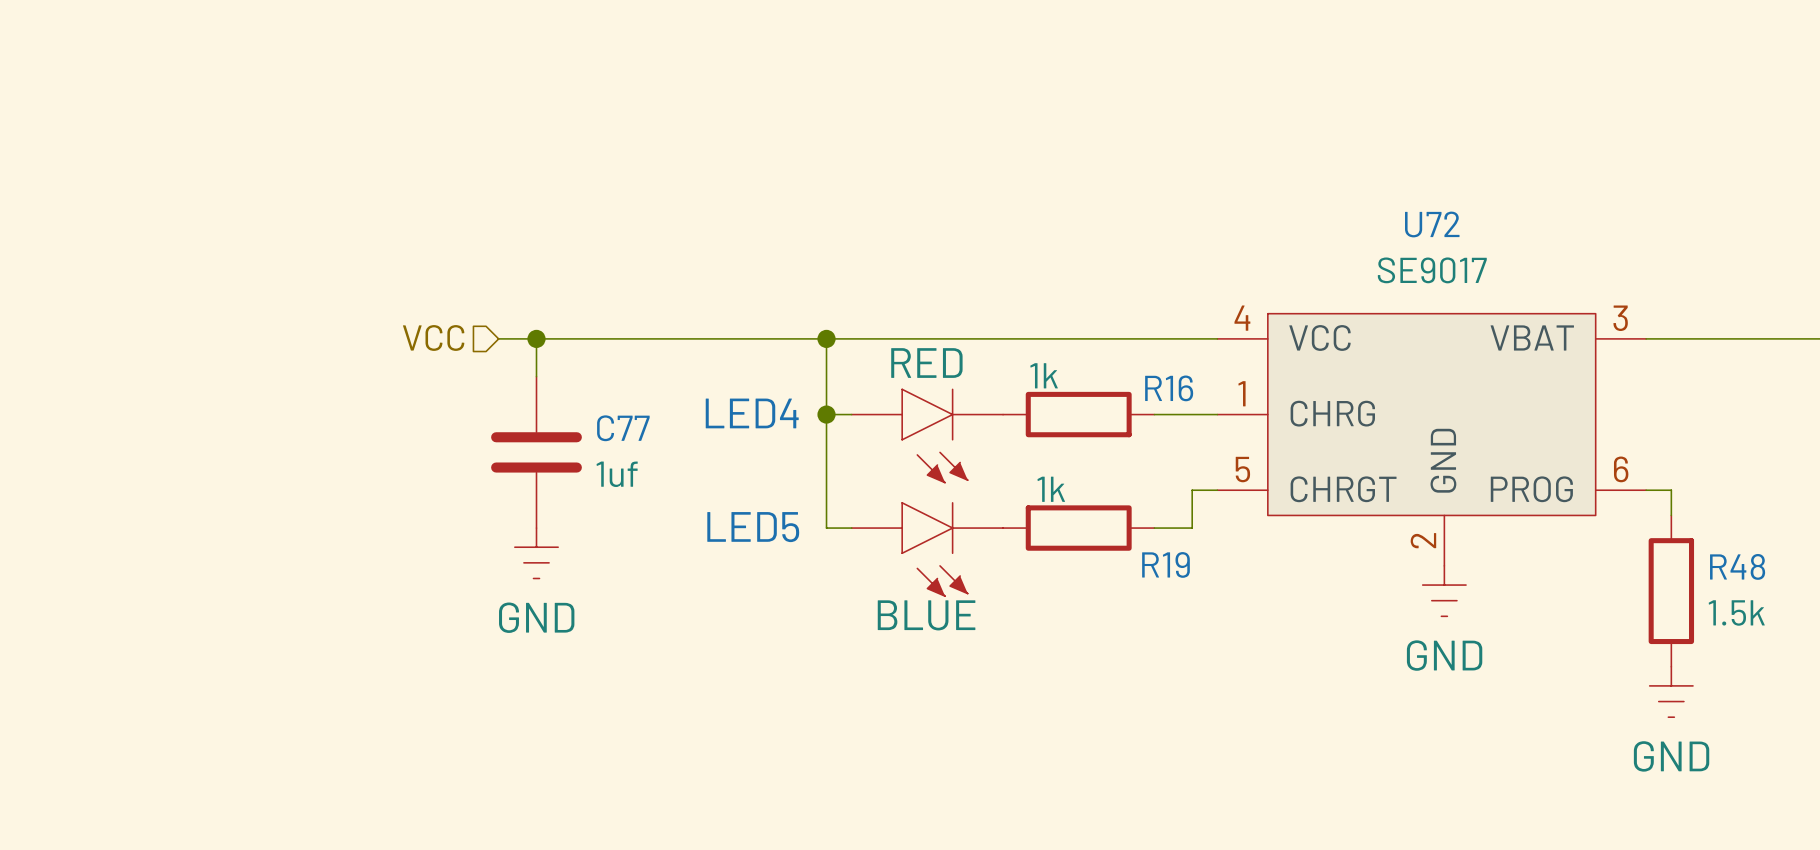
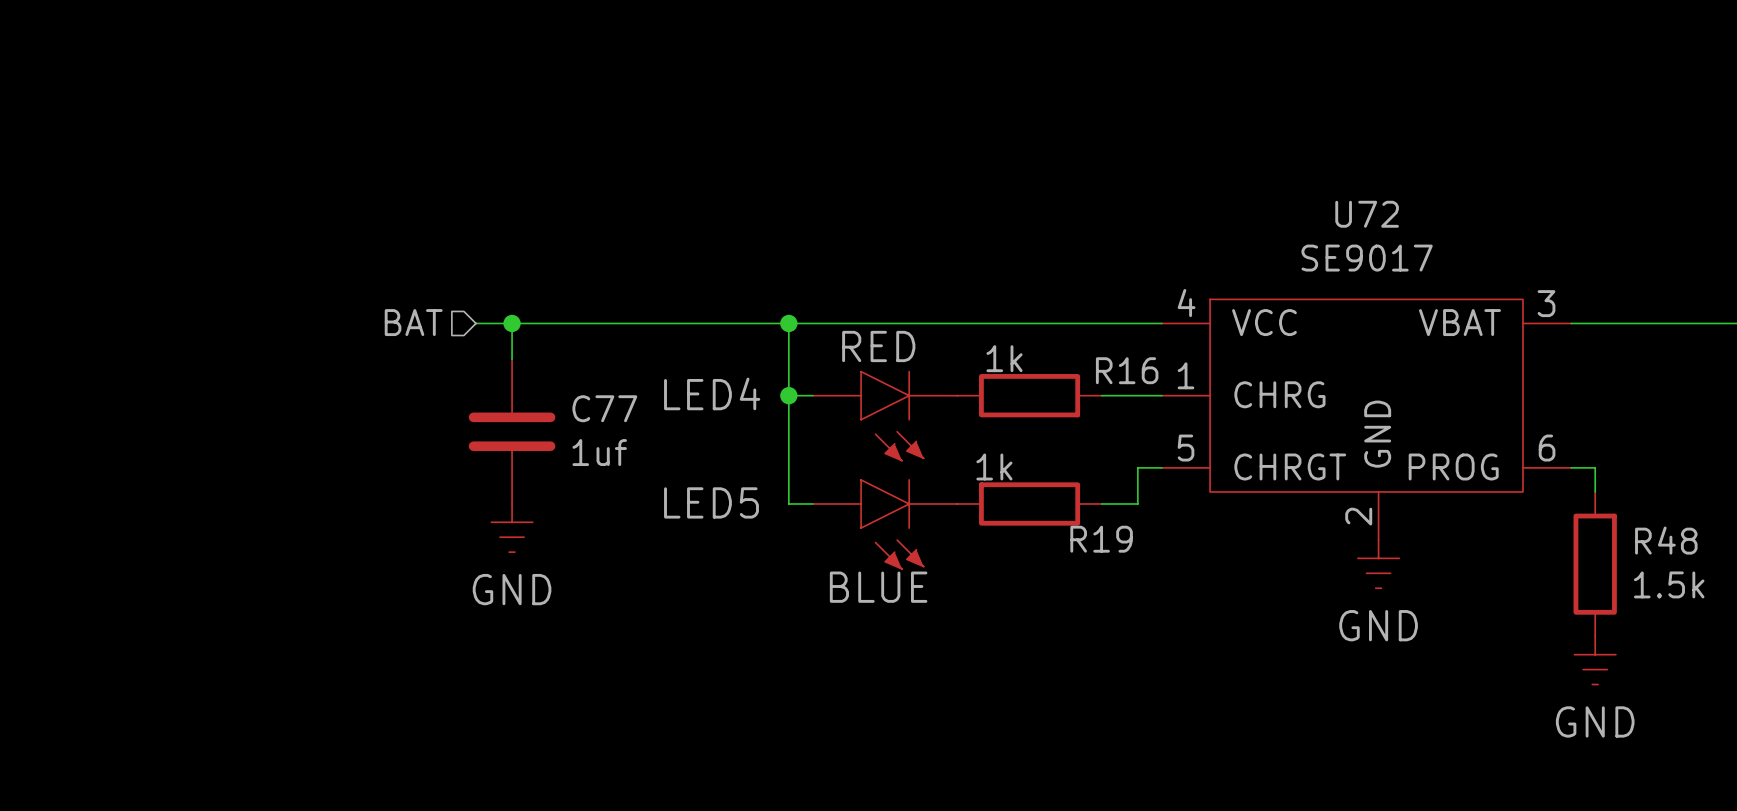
hierarchical label: VCC (433, 337) -> BAT (413, 322)

